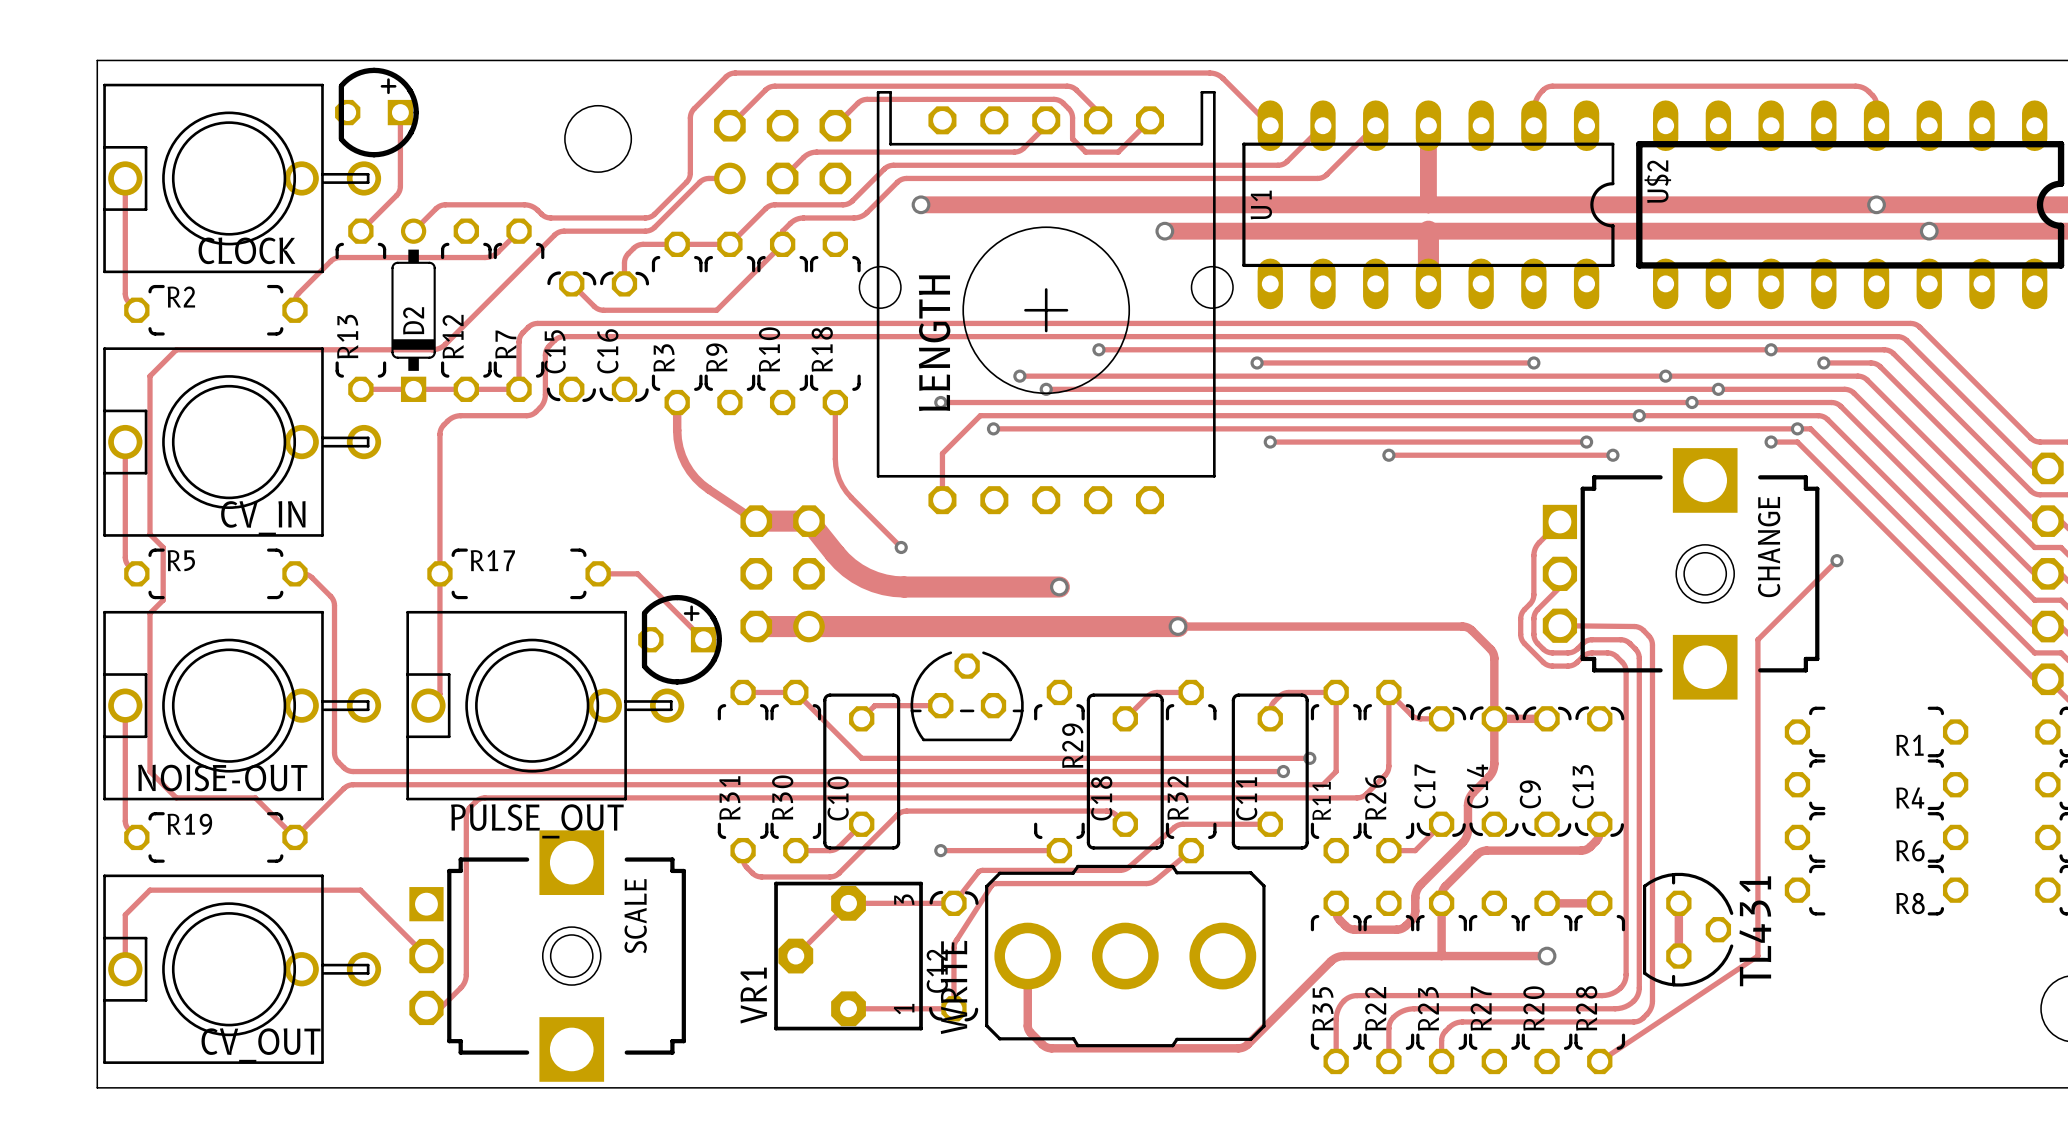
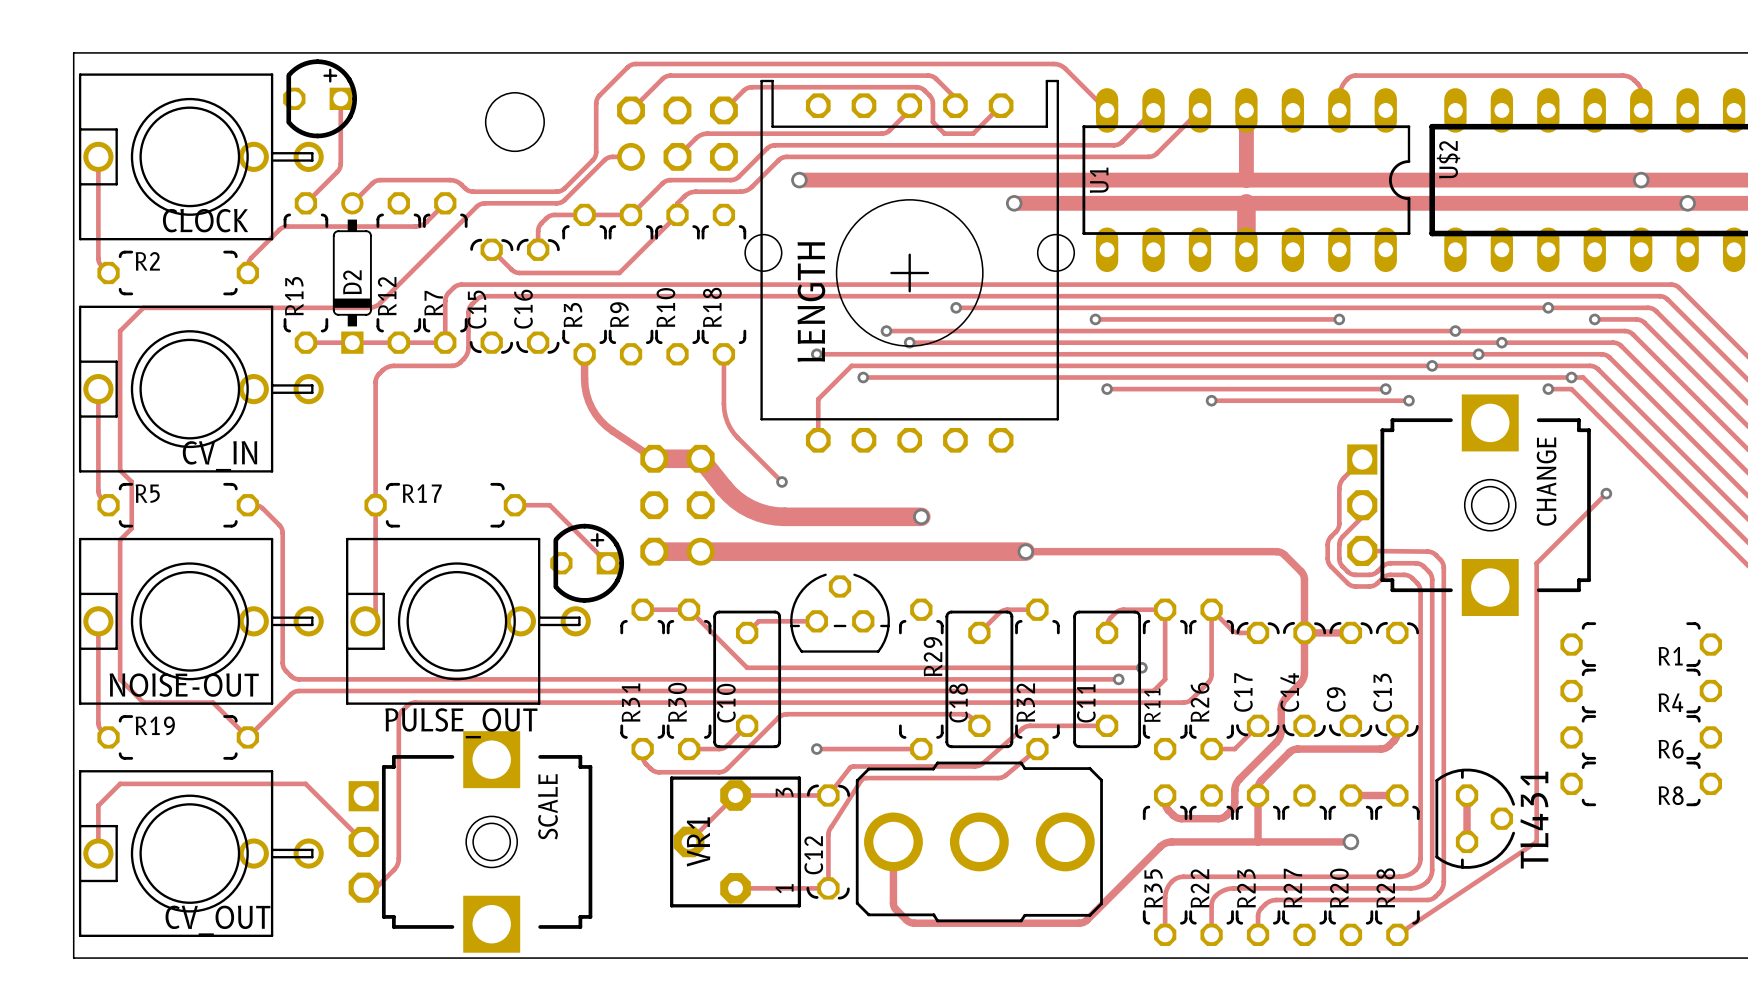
WRITE name: WRITE (953, 987) -> none
VR1 name position: VR1 (753, 995) -> VR1 (698, 841)

